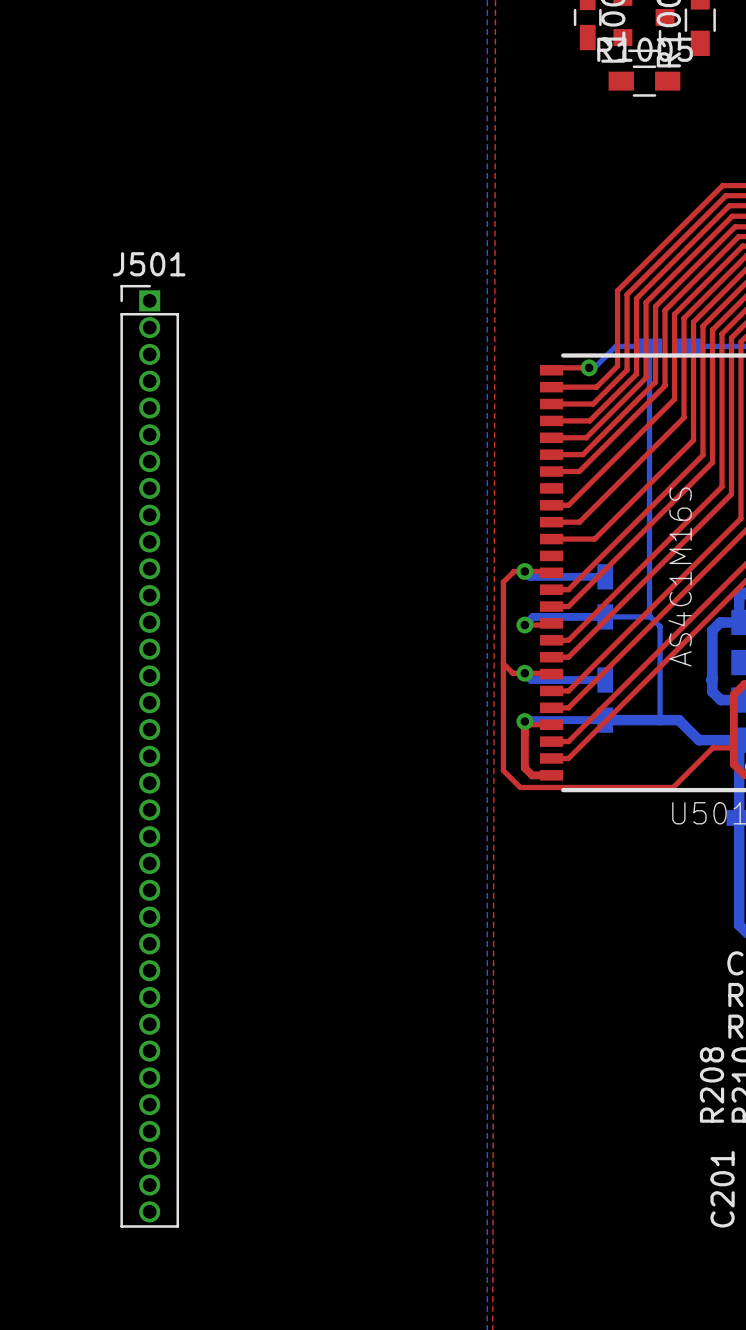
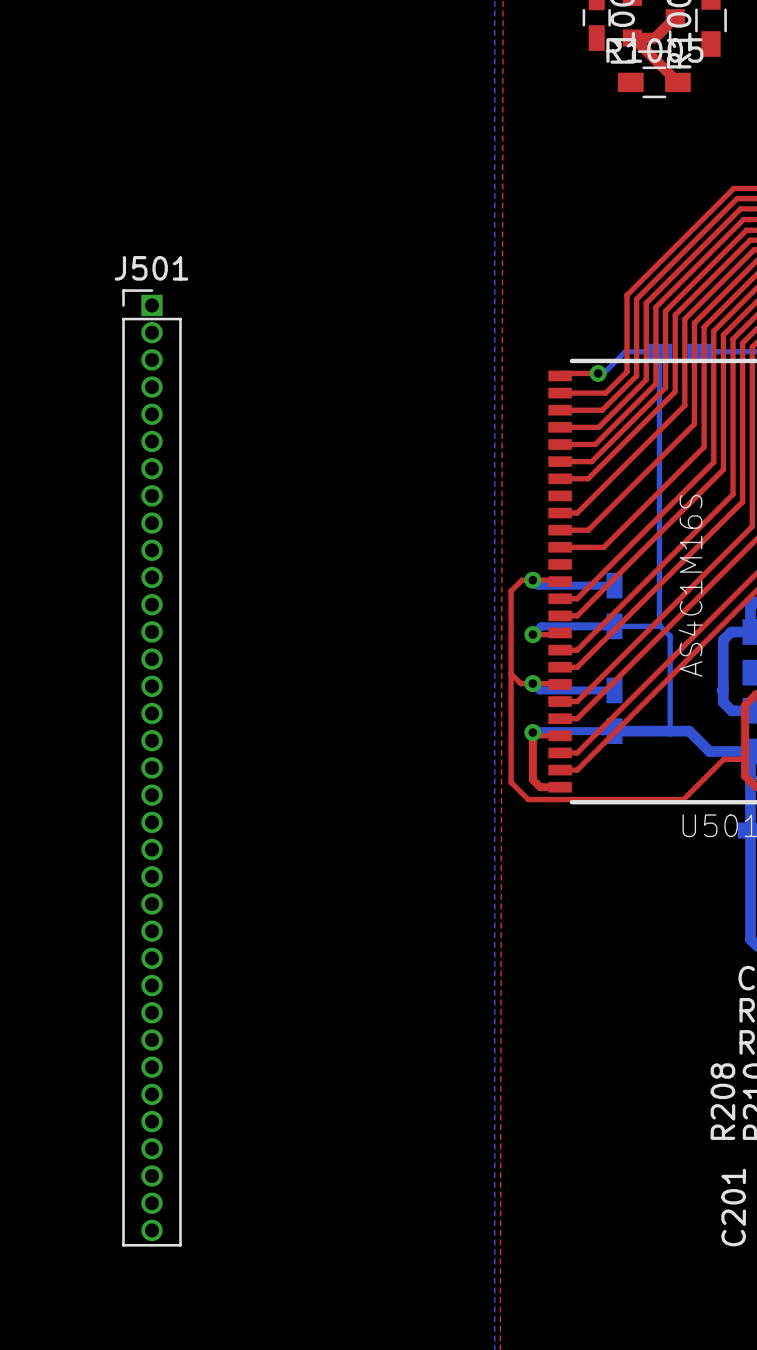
top track: none -> (675, 17) (654, 38) (632, 38)
top track: none -> (633, 38) (677, 82)

